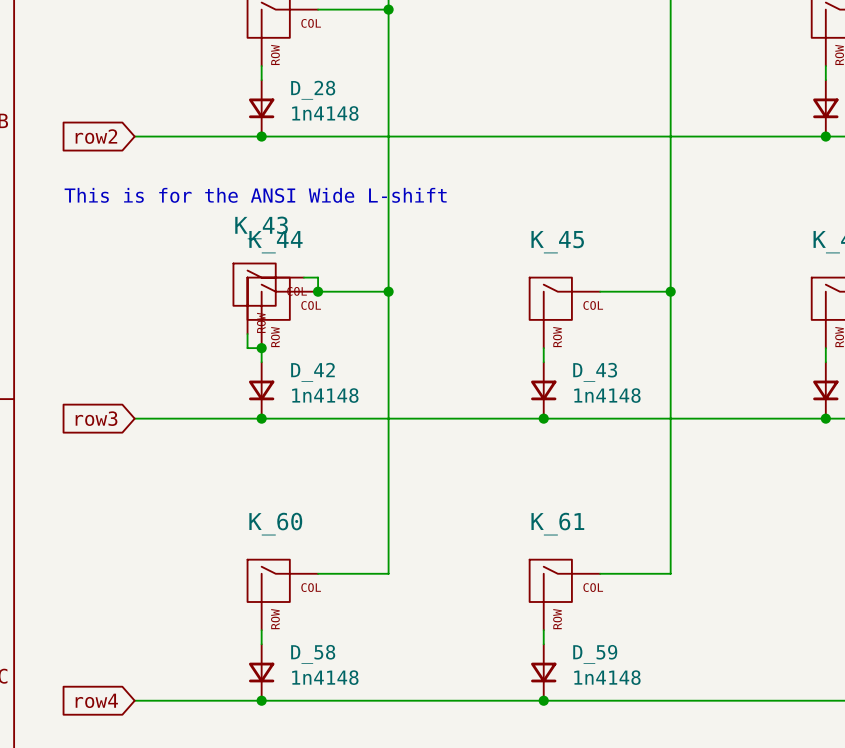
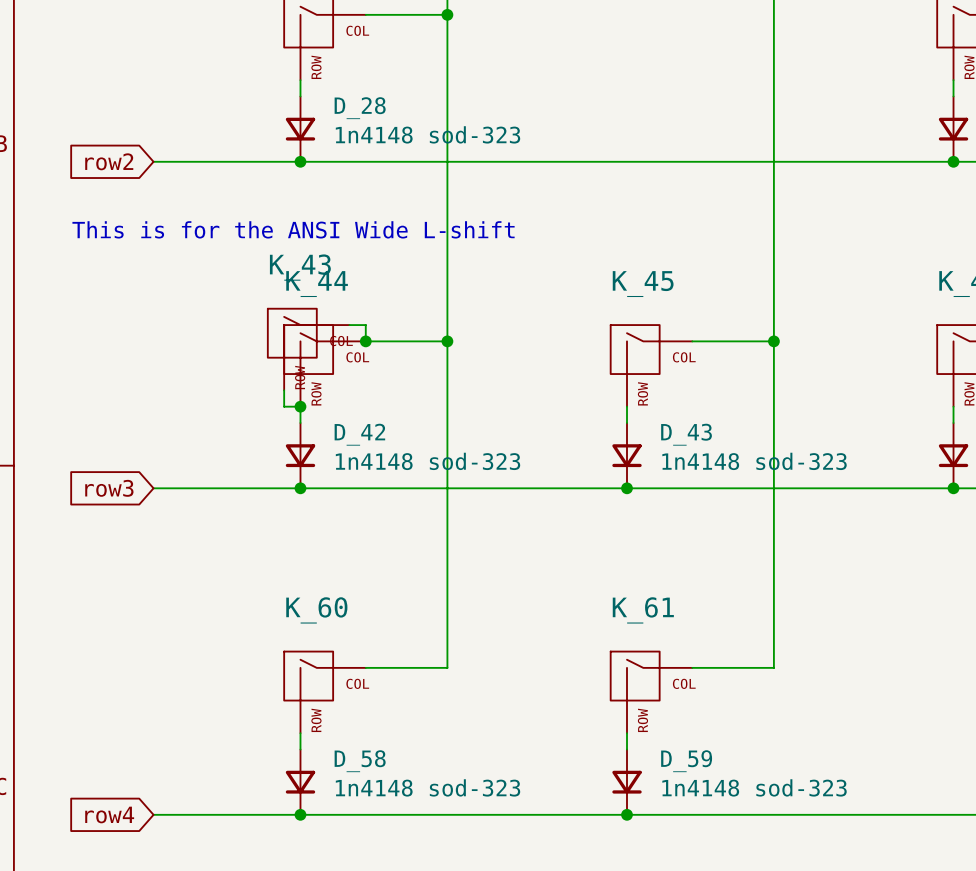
D_28 value: 1n4148 (325, 113) -> 1n4148 sod-323 (428, 134)
D_42 value: 1n4148 (325, 395) -> 1n4148 sod-323 (428, 461)
D_43 value: 1n4148 (607, 395) -> 1n4148 sod-323 (754, 461)
D_58 value: 1n4148 (325, 677) -> 1n4148 sod-323 (428, 787)
D_59 value: 1n4148 (607, 677) -> 1n4148 sod-323 (754, 787)

